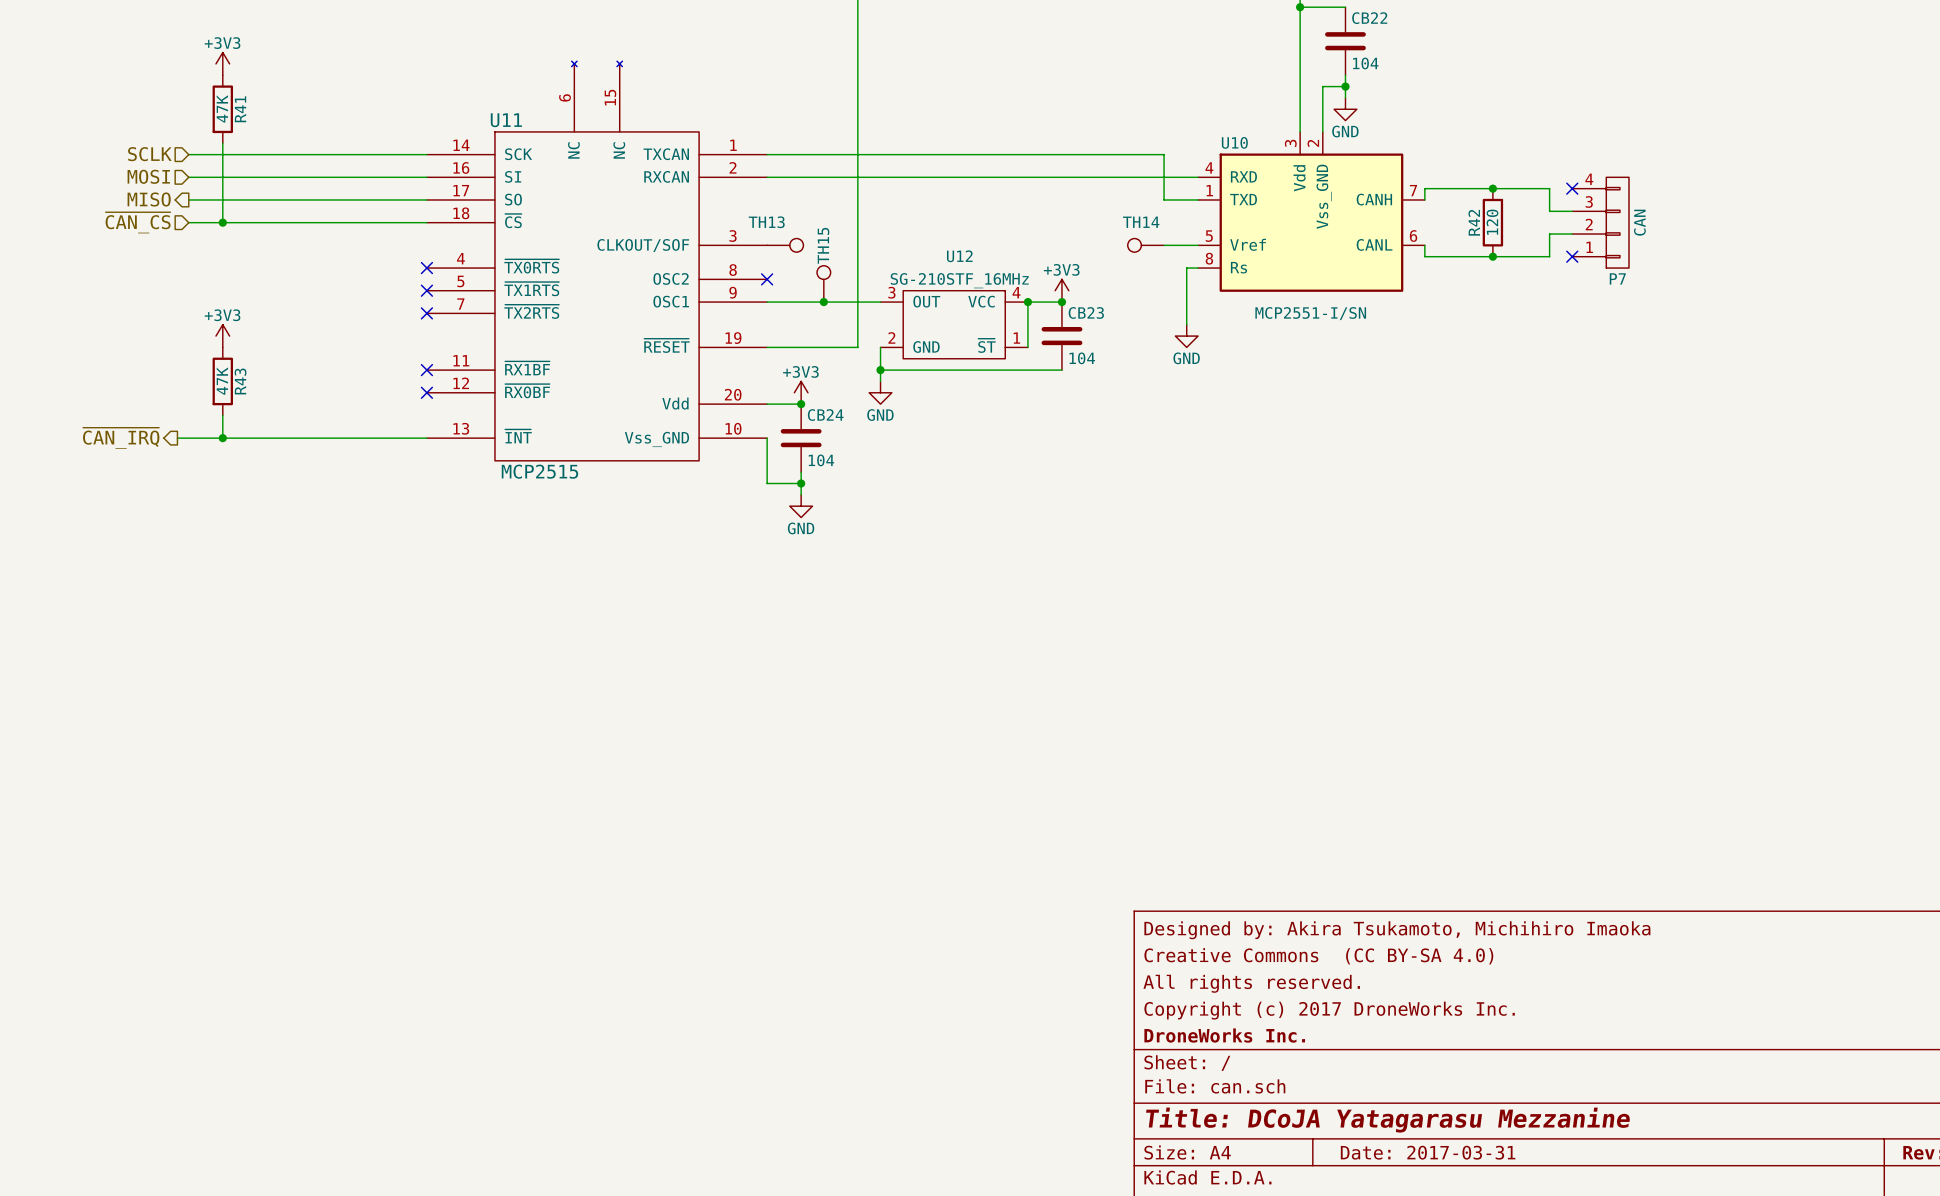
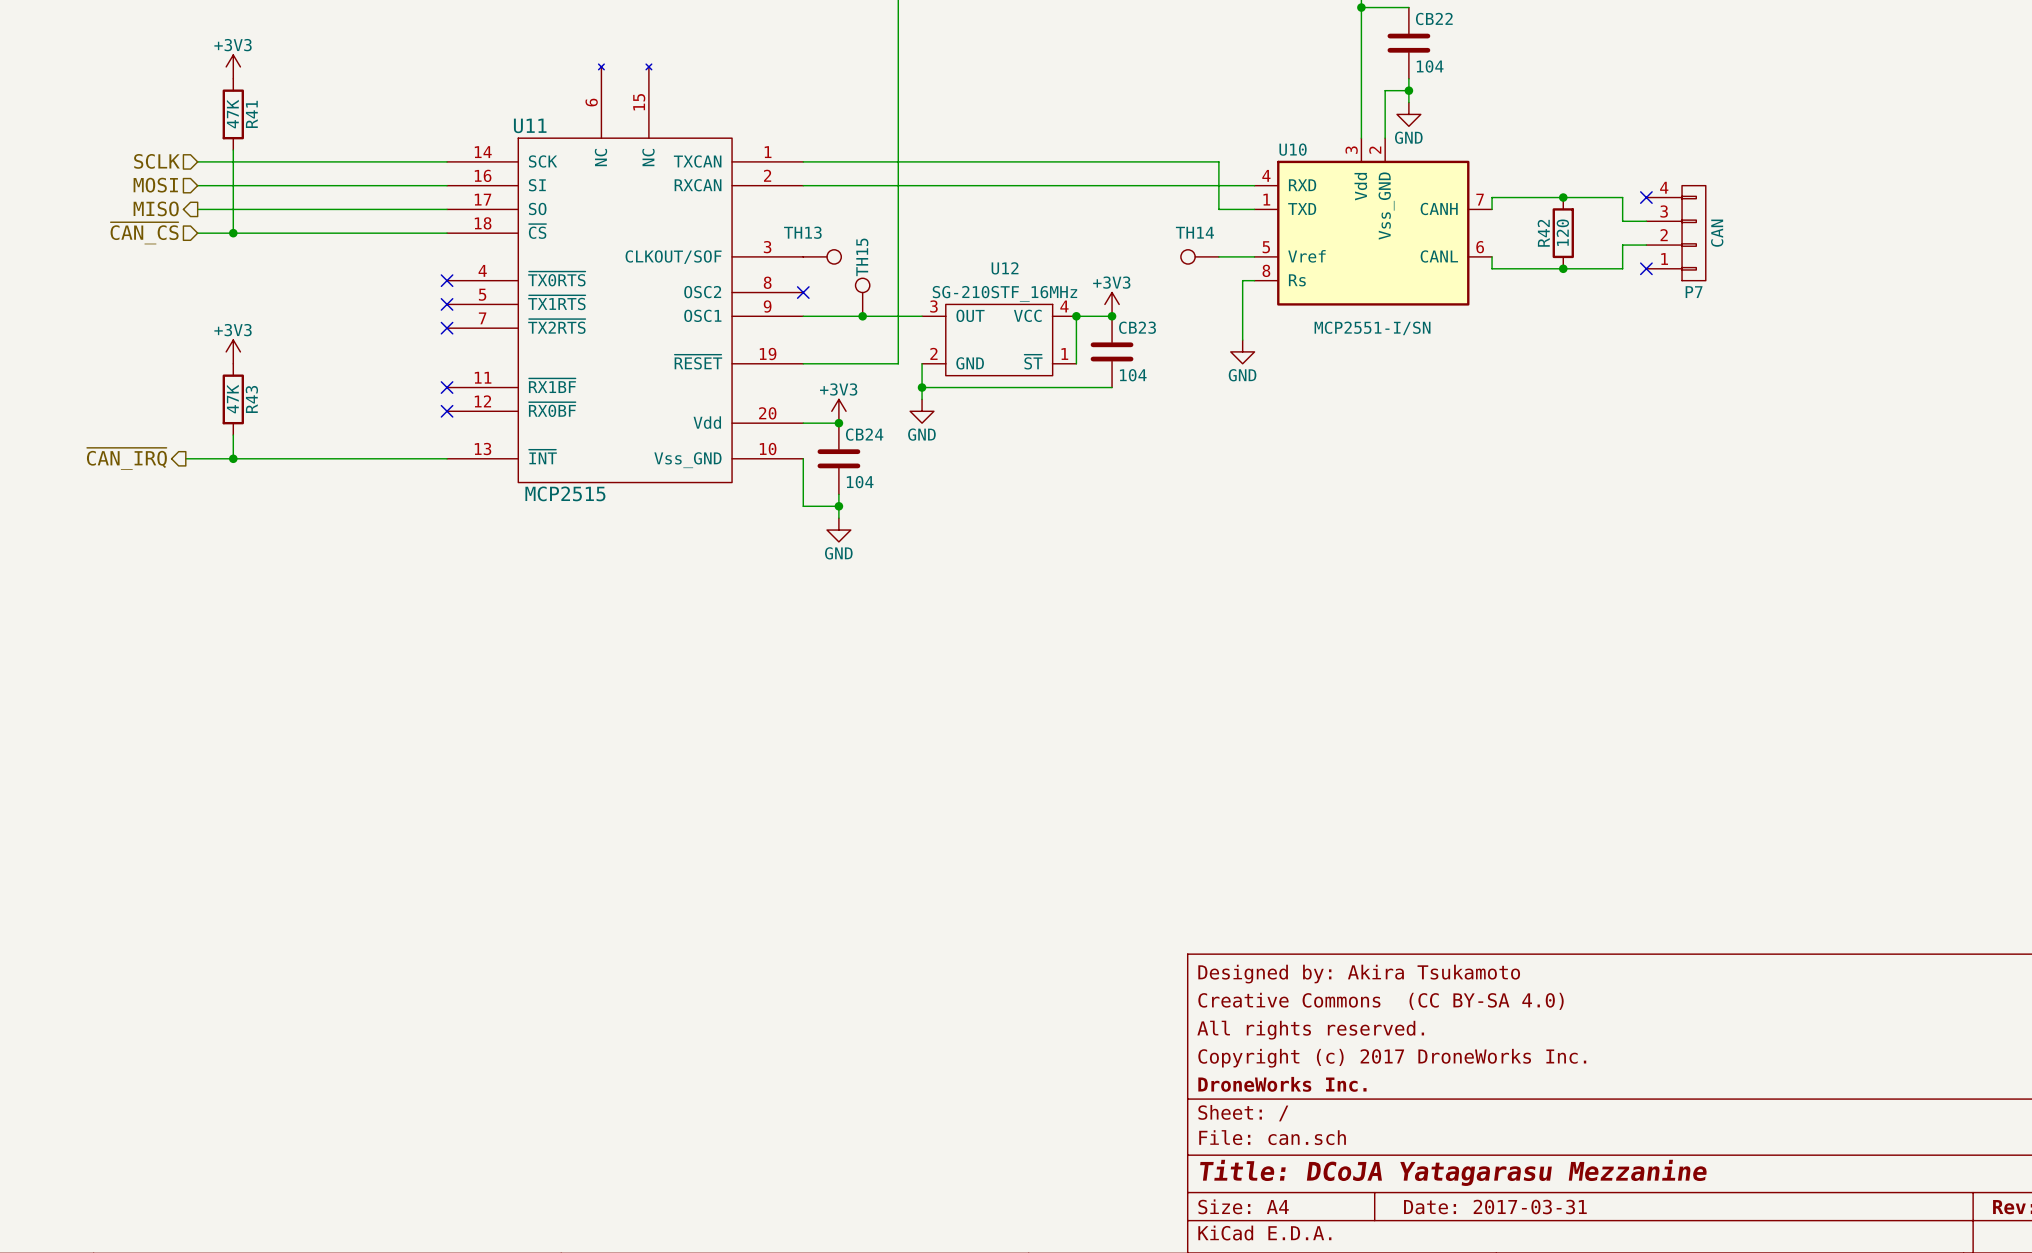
title block: Designed by: Akira Tsukamoto, Michihiro Imaoka (1397, 930) -> Designed by: Akira Tsukamoto (1359, 974)

